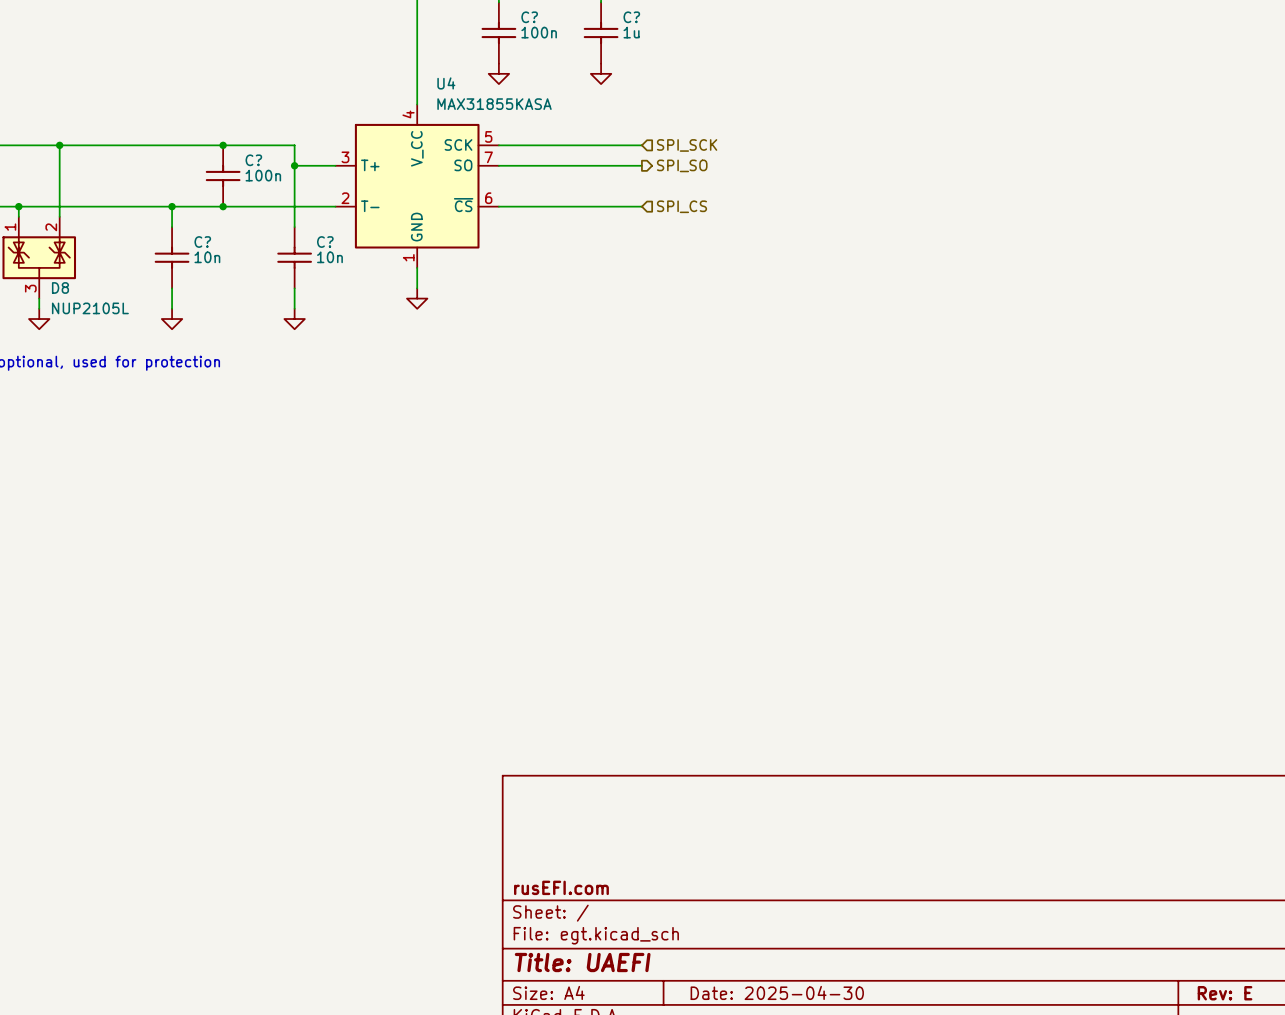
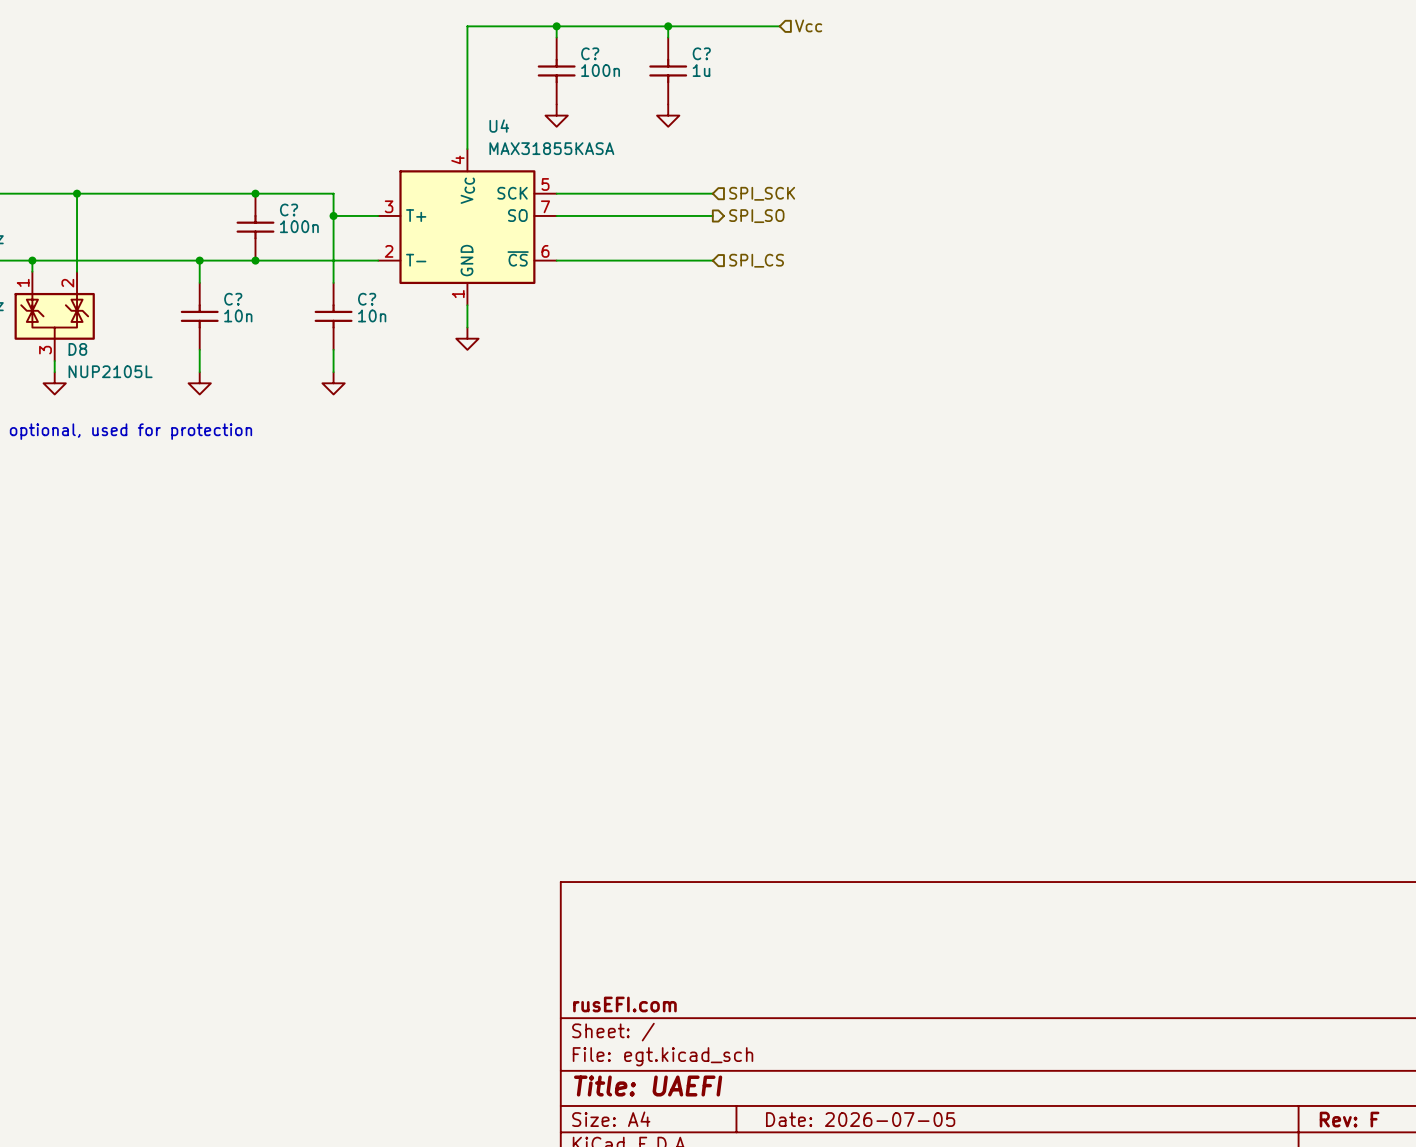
U4 symbol: [335, 104, 499, 268] -> [378, 149, 557, 306]
power symbol position: (417, 298) -> (467, 338)
title block: Date: 2025-04-30 (777, 992) -> Date: 2026-07-05 (860, 1119)
title block: Rev: E (1225, 993) -> Rev: F (1349, 1119)

